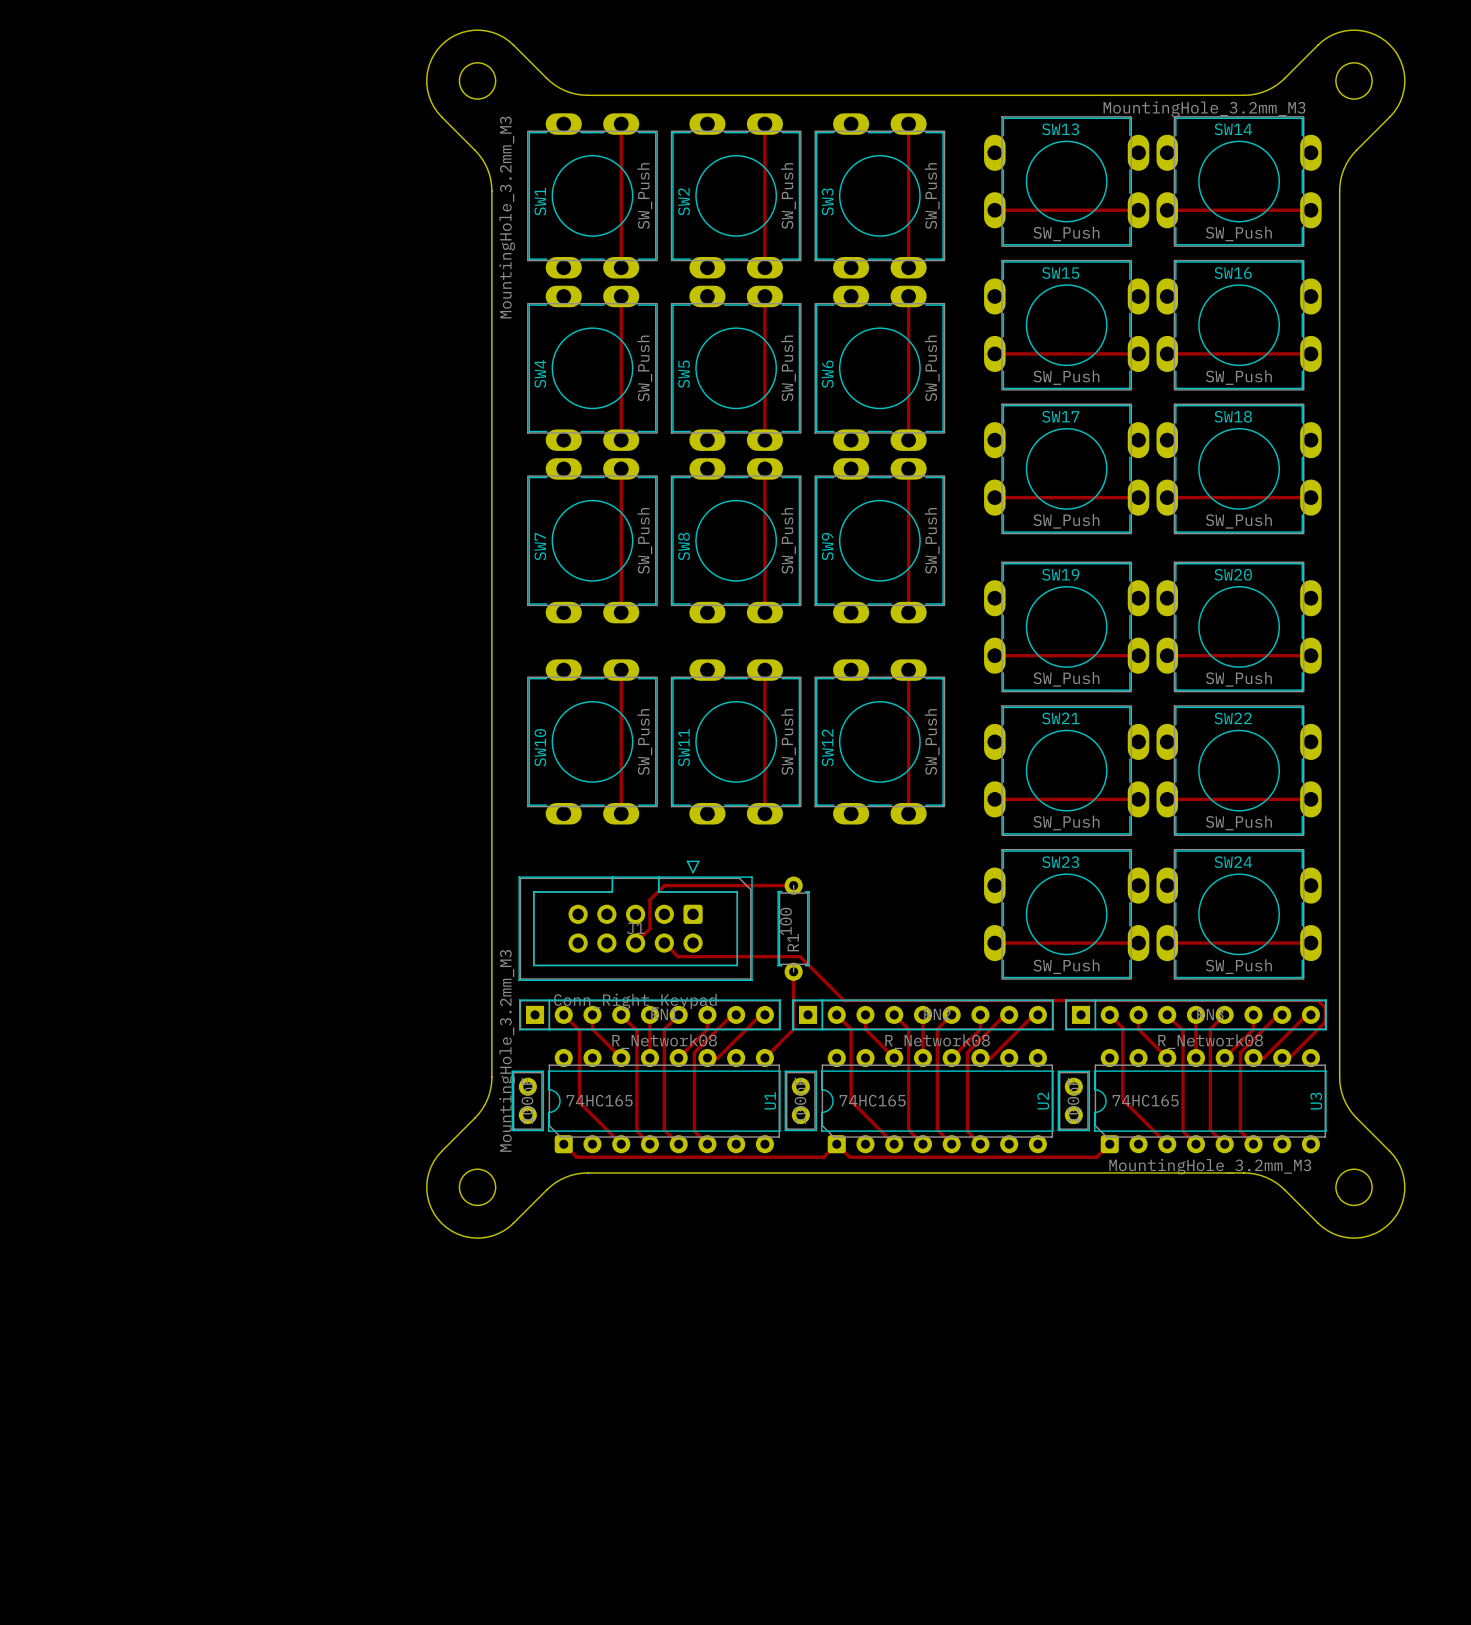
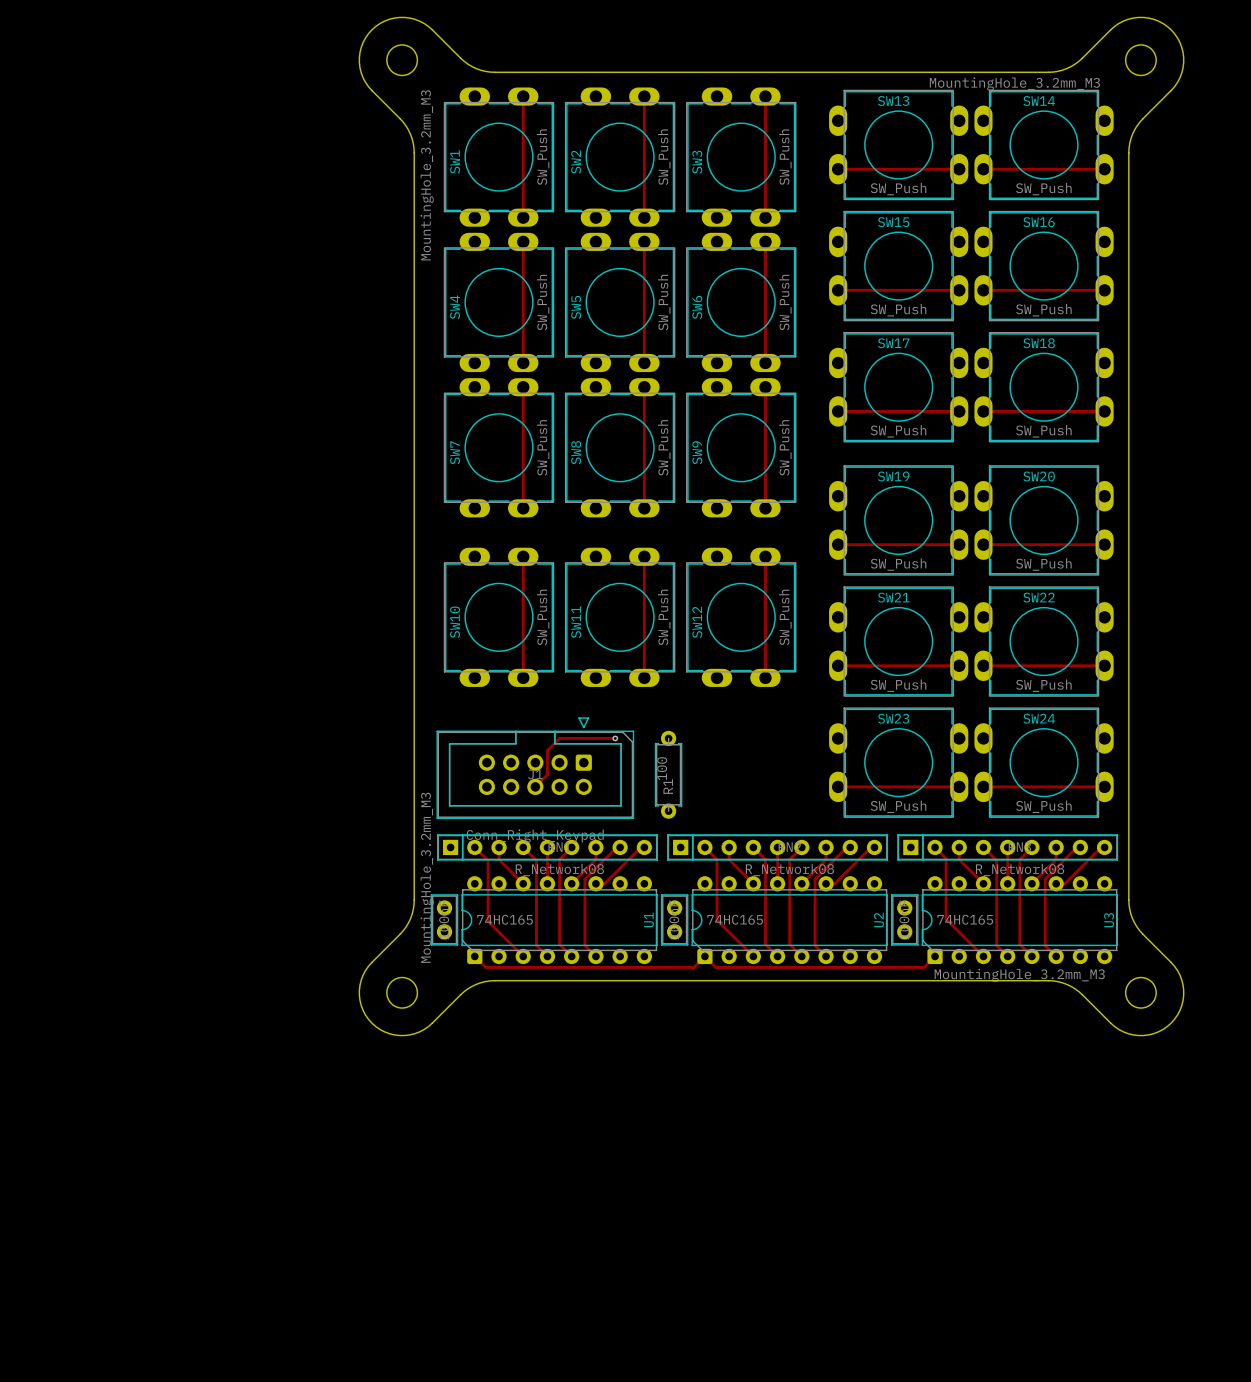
track: (730, 885) (793, 885) -> none
via: none -> (615, 738)
track: (664, 943) (677, 956) (800, 956) (843, 1000) (1318, 1000) (1325, 1007) (1325, 1022) (1289, 1058) (1282, 1058) -> none
track: (793, 971) (793, 1029) (764, 1058) -> none

